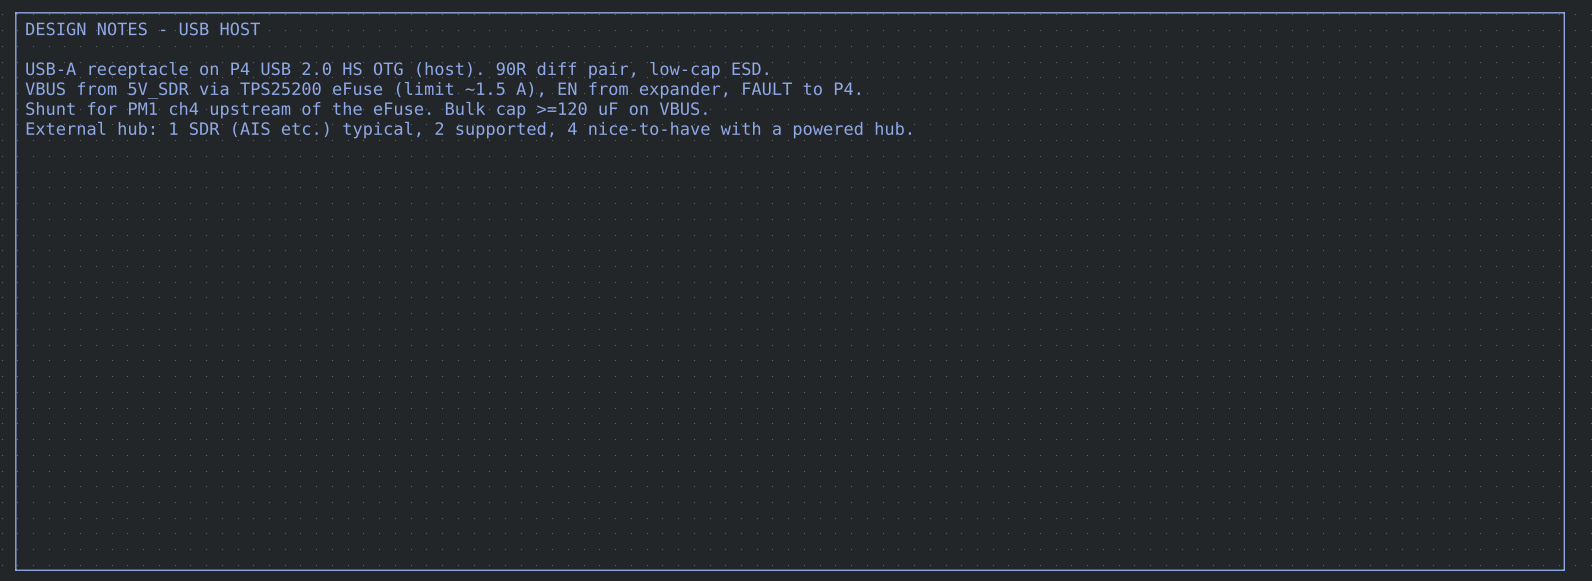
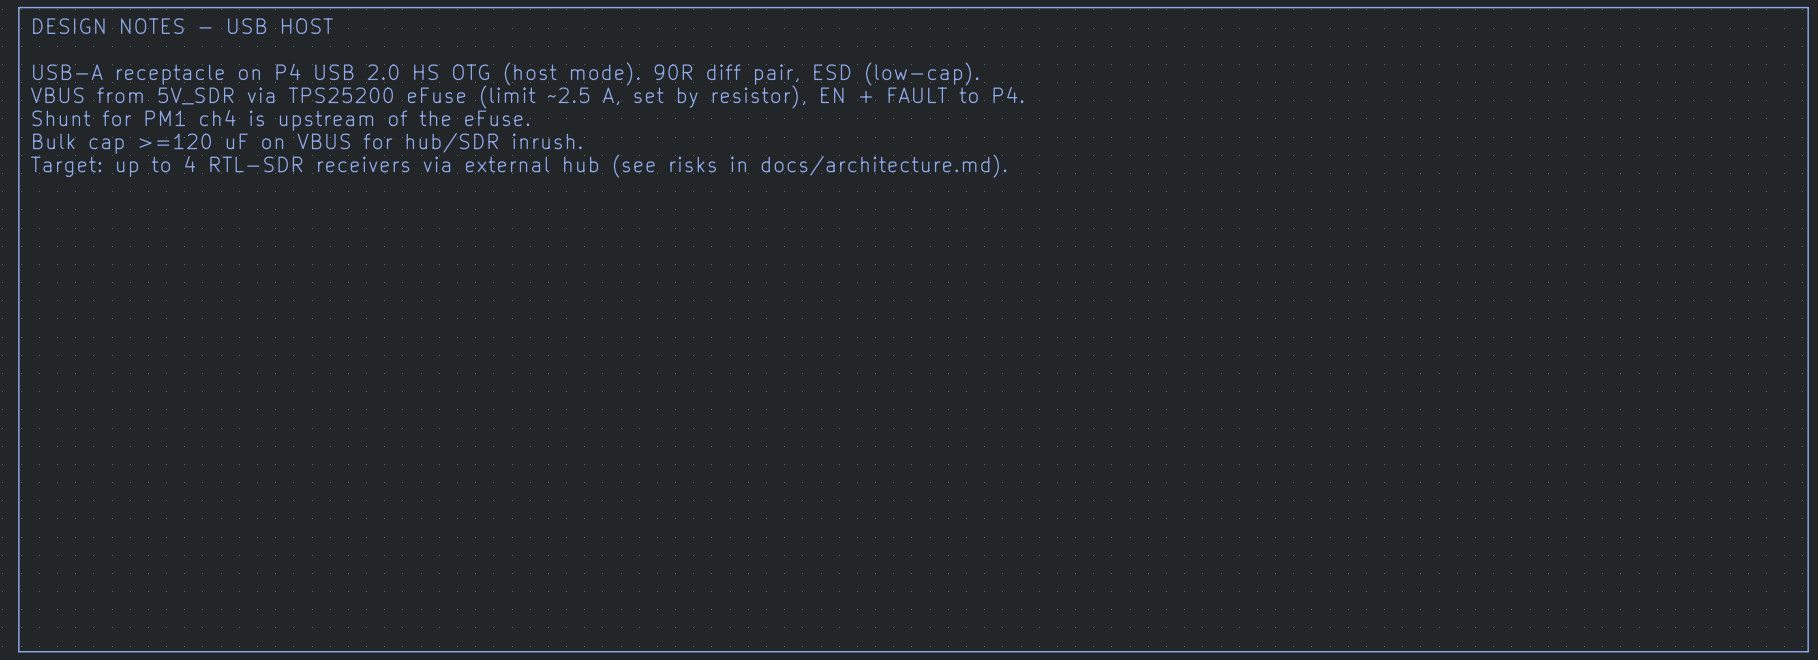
text: USB-A receptacle on P4 USB 2.0 HS OTG (host). 90R diff pair, low-cap ESD. (397, 70) -> USB-A receptacle on P4 USB 2.0 HS OTG (host mode). 90R diff pair, ESD (low-cap). (505, 73)
text: VBUS from 5V_SDR via TPS25200 eFuse (limit ~1.5 A), EN from expander, FAULT to P4. (442, 90) -> VBUS from 5V_SDR via TPS25200 eFuse (limit ~2.5 A, set by resistor), EN + FAULT to P4. (527, 97)
text: Shunt for PM1 ch4 upstream of the eFuse. Bulk cap >=120 uF on VBUS. (366, 110) -> Shunt for PM1 ch4 is upstream of the eFuse. (280, 120)
text: External hub: 1 SDR (AIS etc.) typical, 2 supported, 4 nice-to-have with a powered hub. (468, 130) -> Bulk cap >=120 uF on VBUS for hub/SDR inrush. (307, 143)
text: none -> Target: up to 4 RTL-SDR receivers via external hub (see risks in docs/architecture.md). (518, 166)

